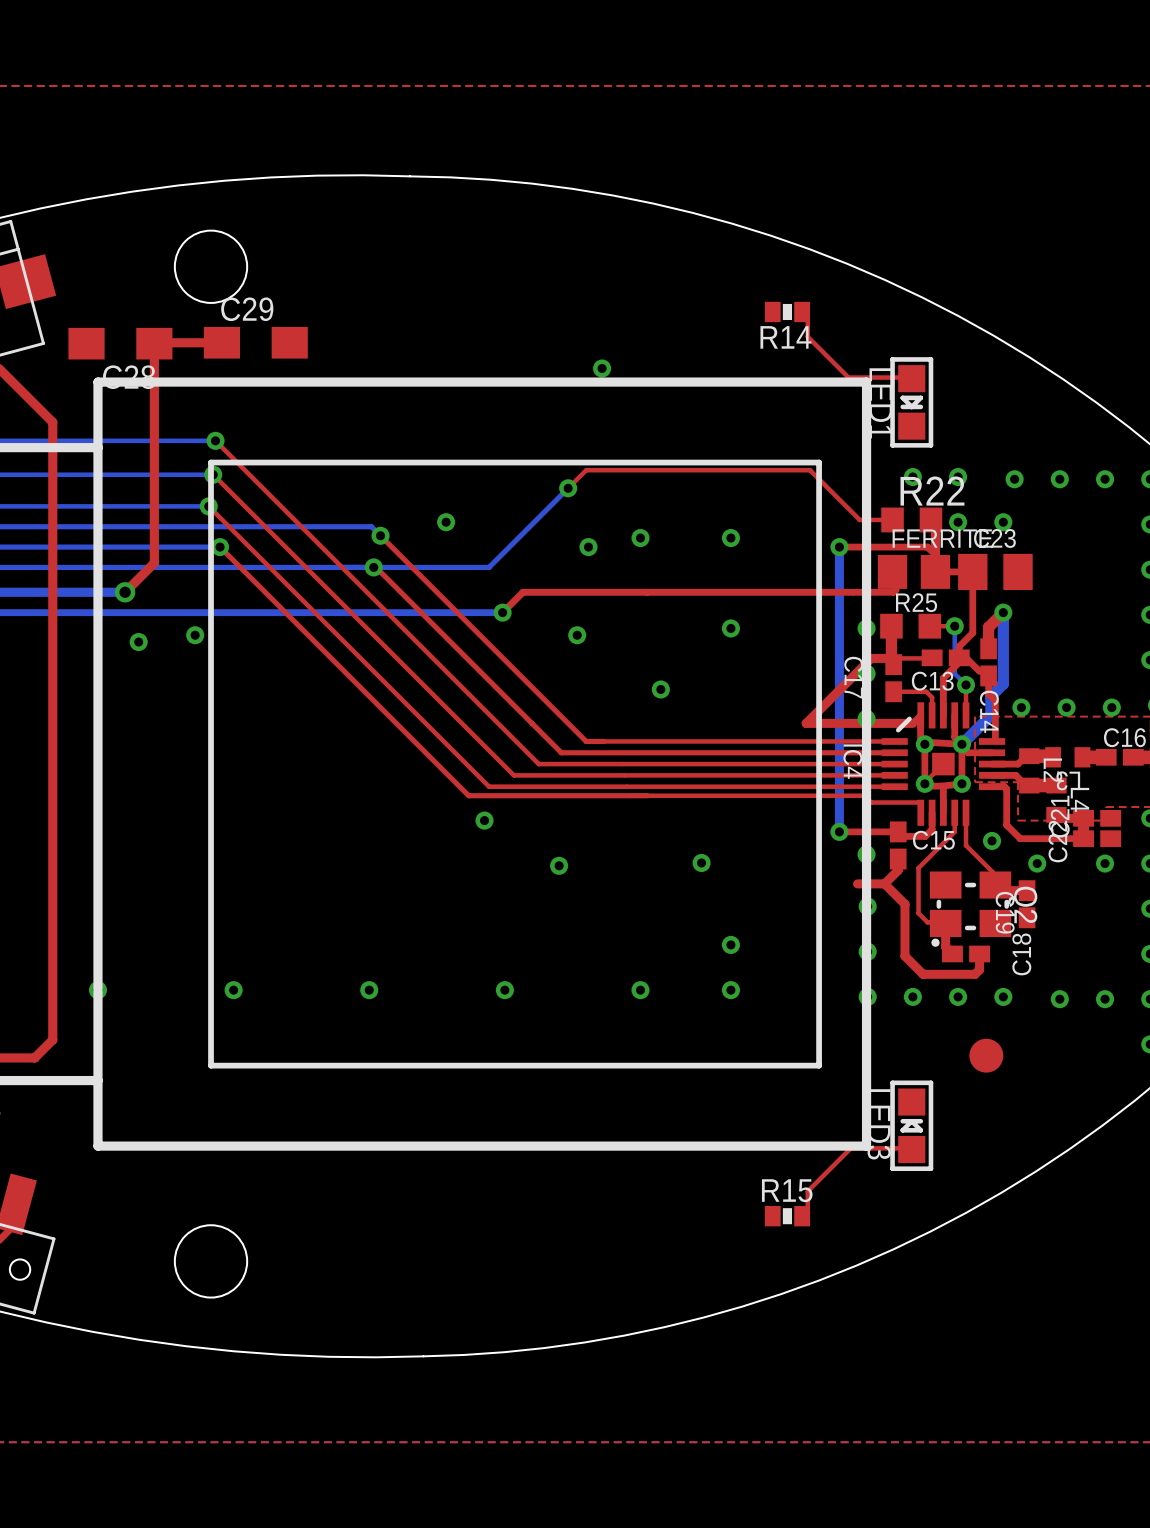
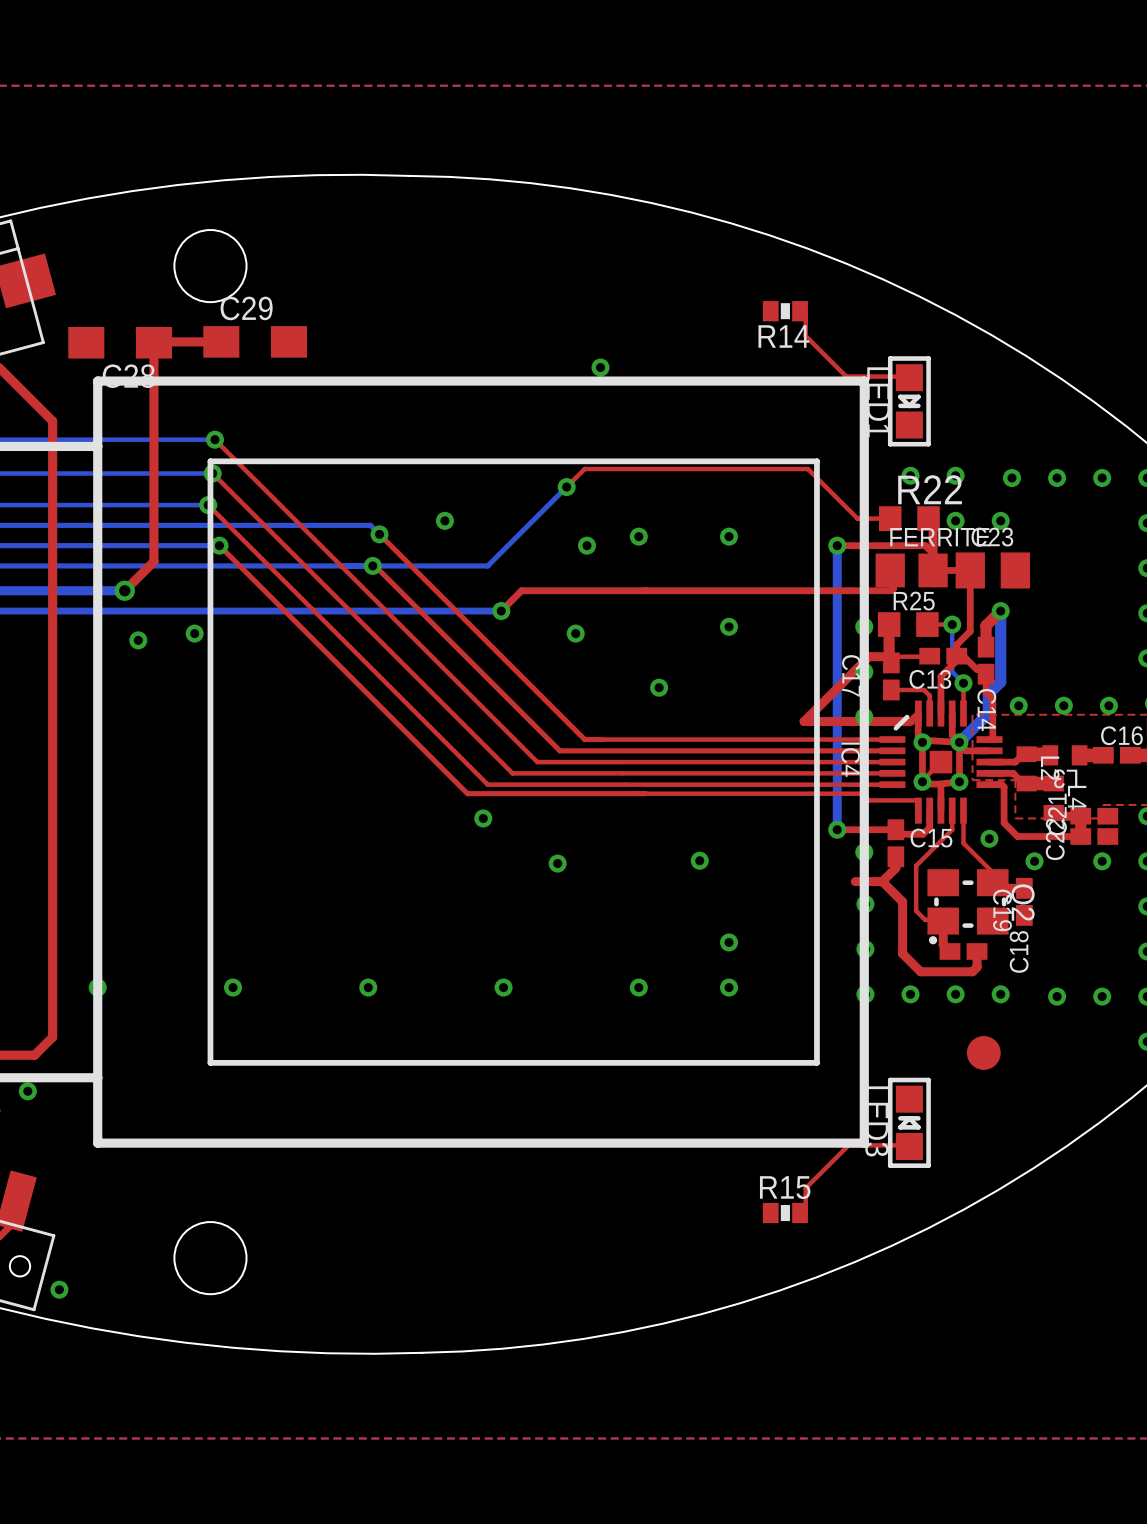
via: none -> (27, 1091)
via: none -> (59, 1289)

